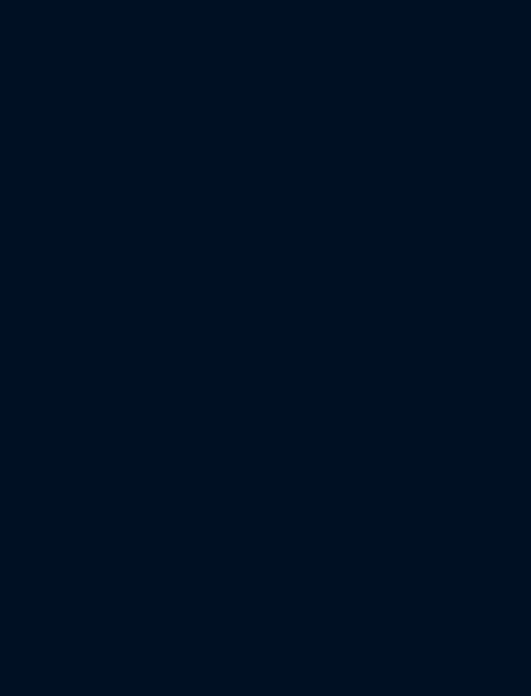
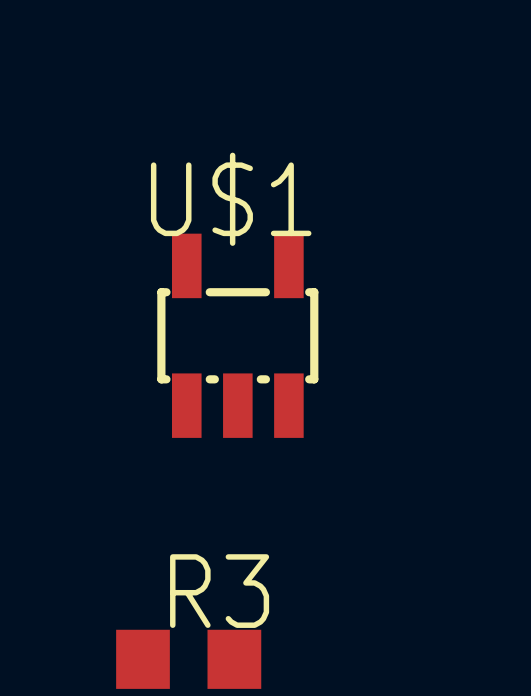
U$1: none -> (237, 335)
R3: none -> (188, 659)

